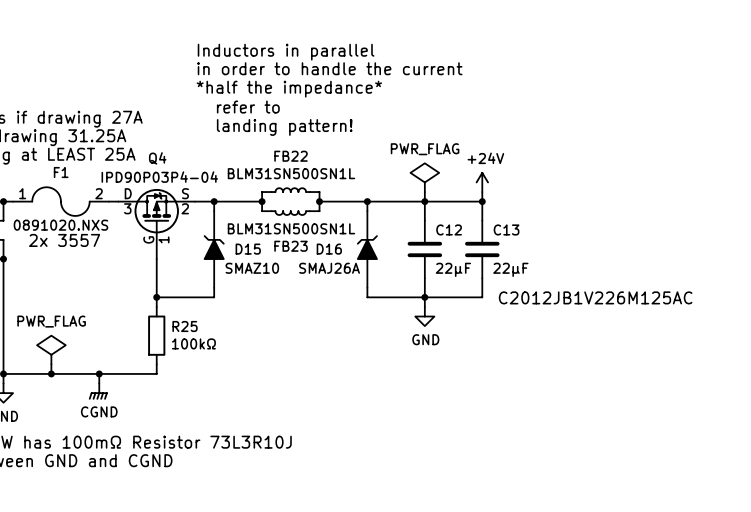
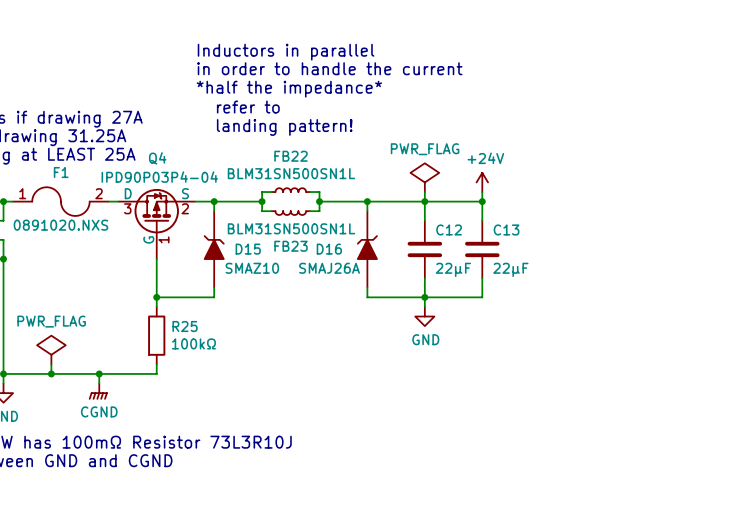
text: 2x 3557 (64, 240) -> none
text: C2012JB1V226M125AC (595, 297) -> none

